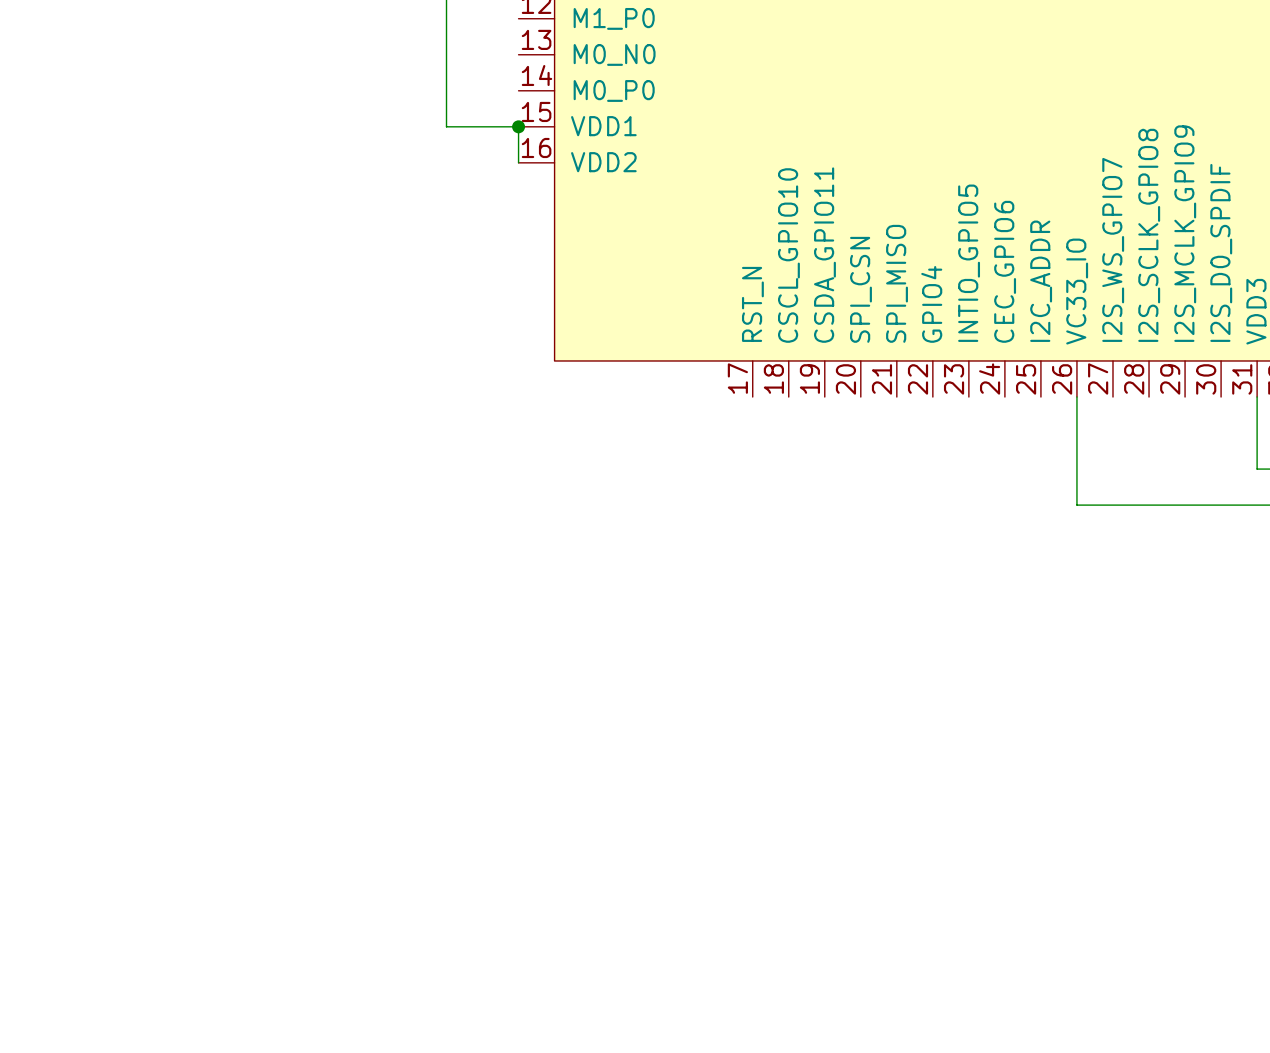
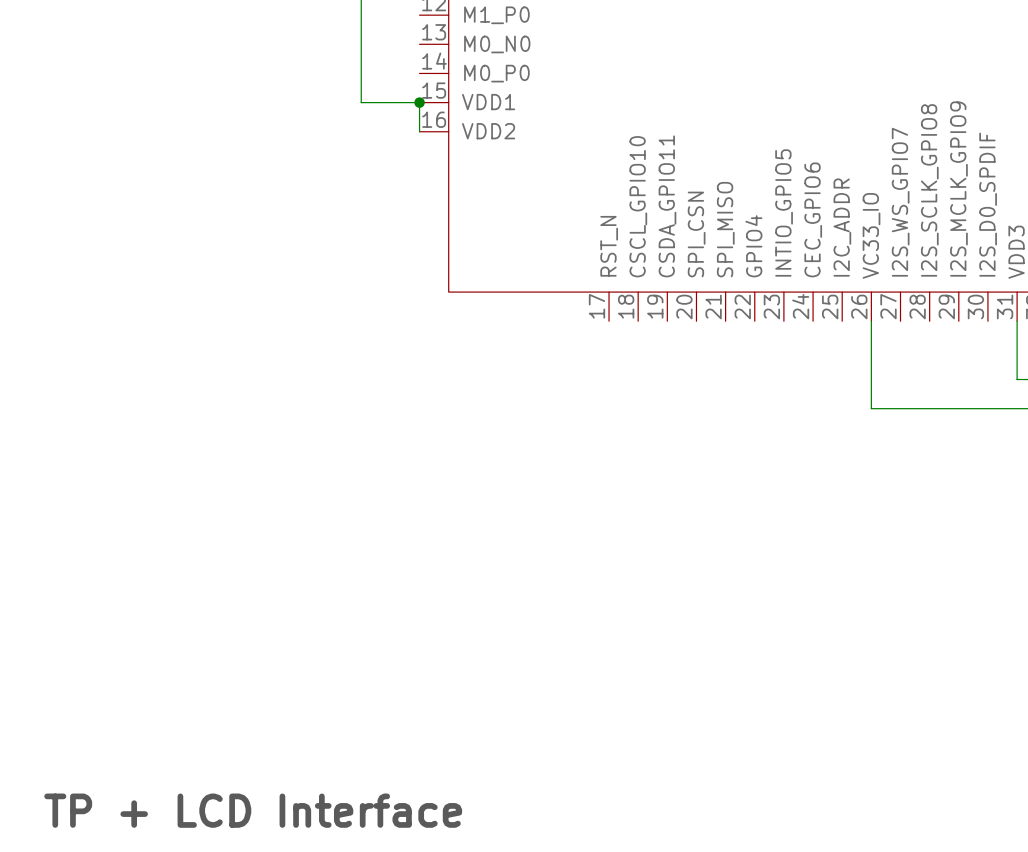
text: none -> TP + LCD Interface (253, 810)

